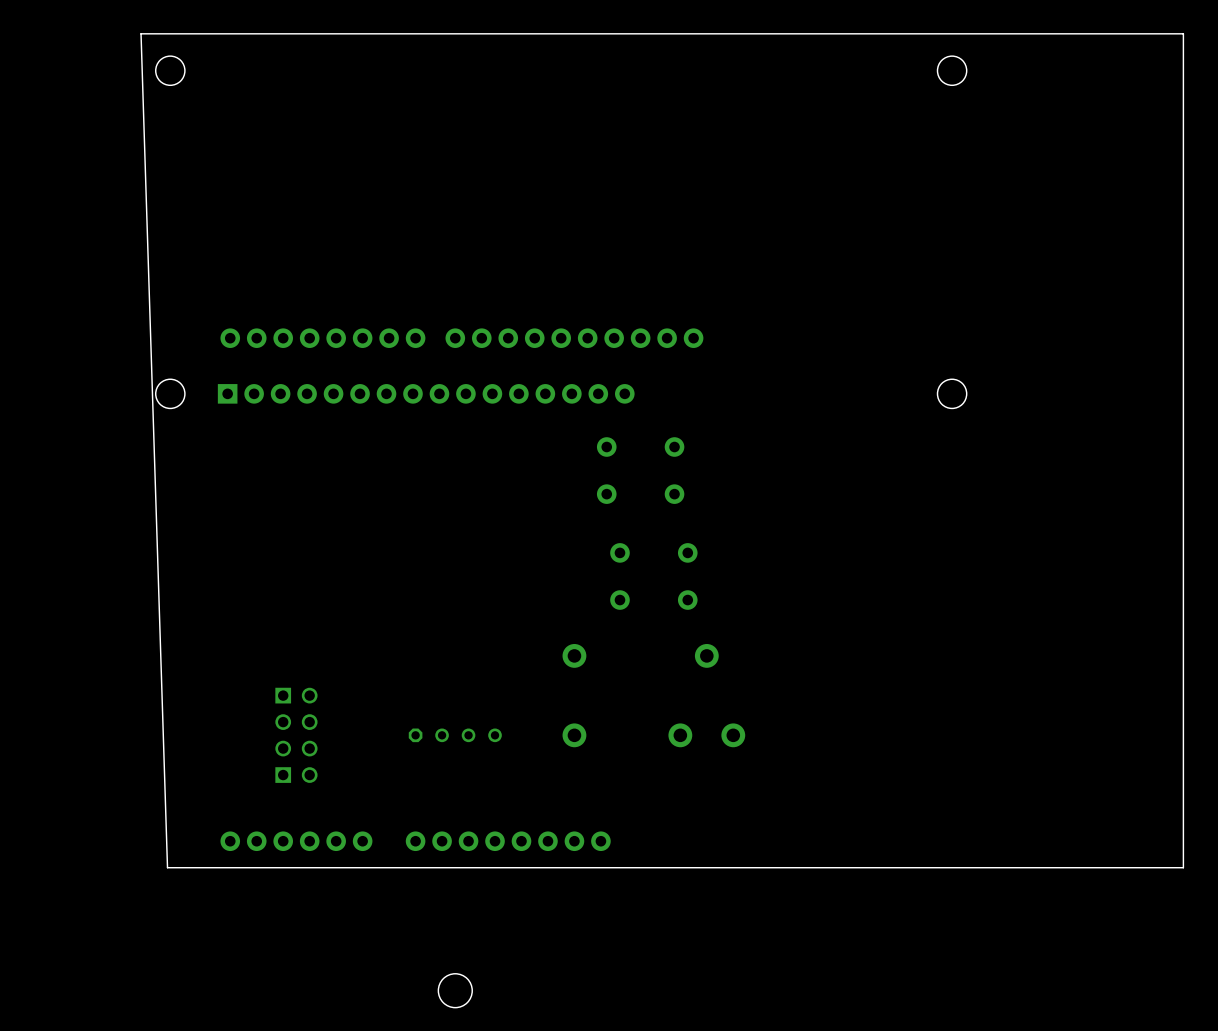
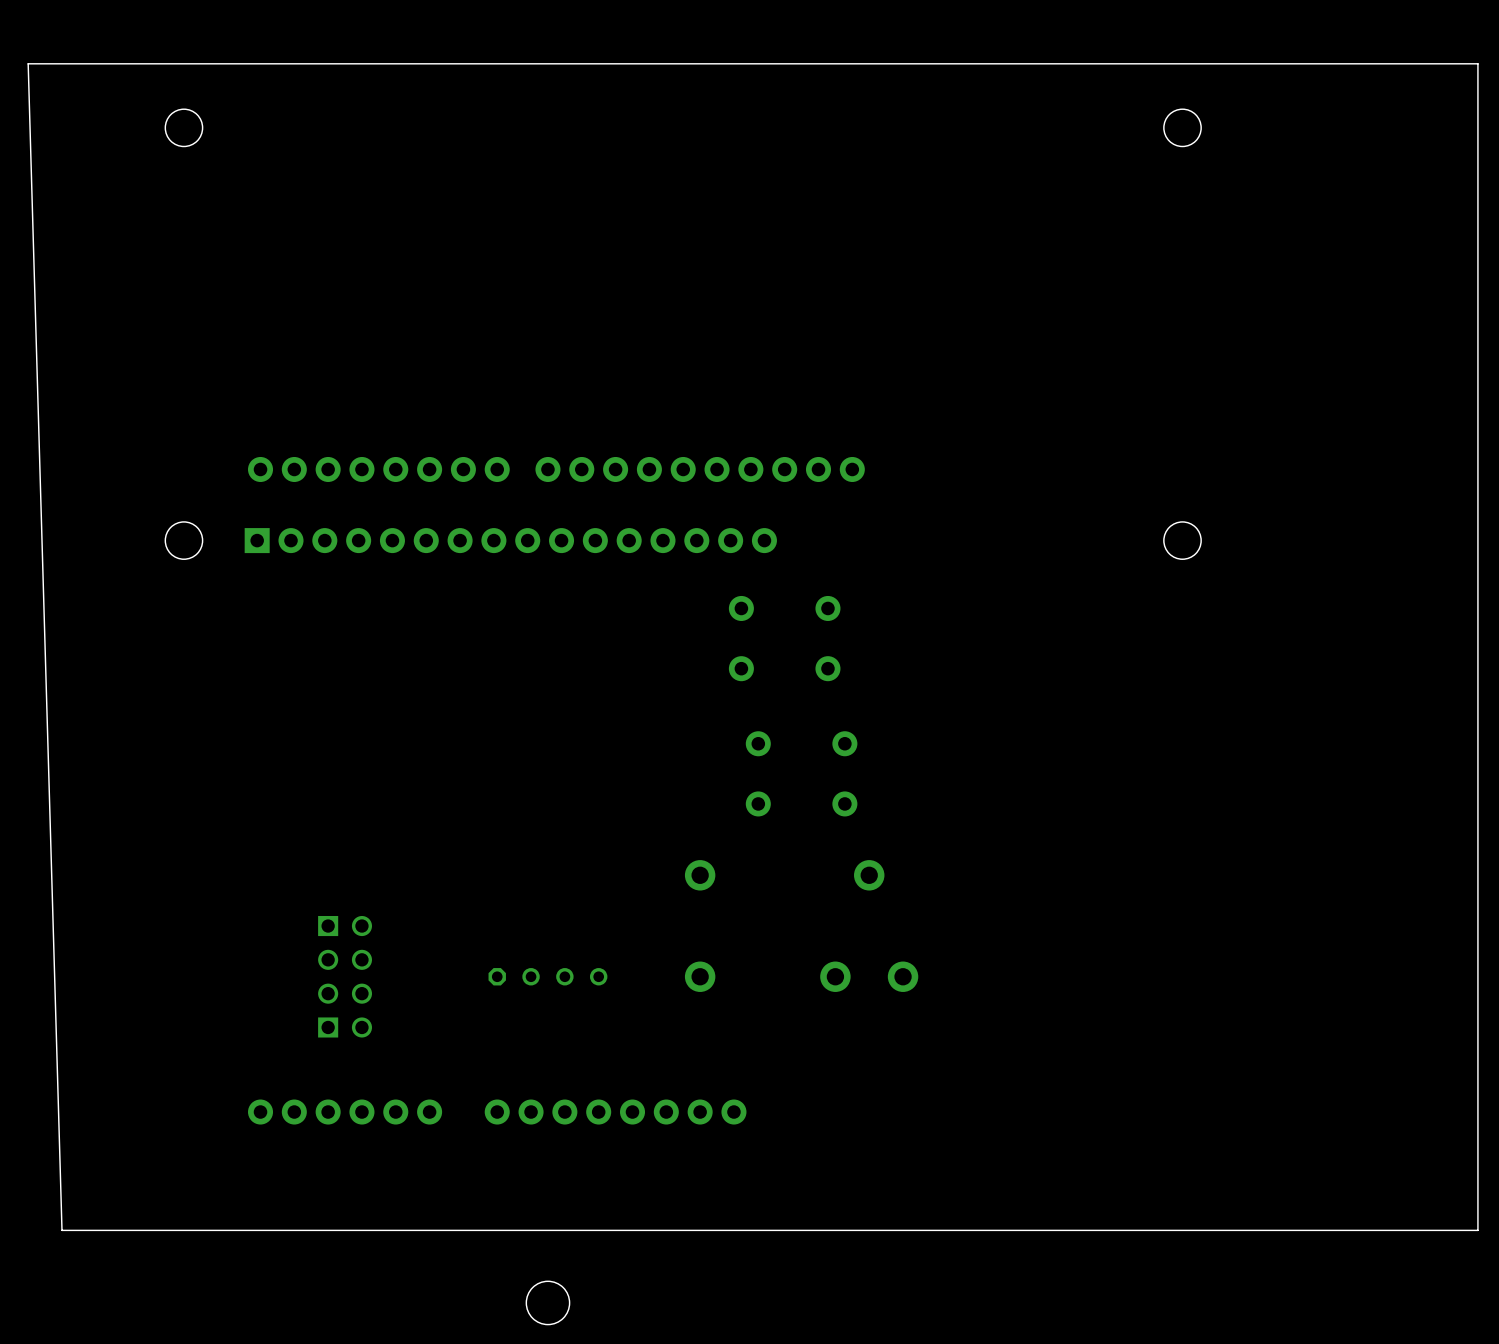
board edge: (1183, 33) (141, 33) (167, 867) (1183, 867) -> (1477, 80) (1477, 63) (28, 63) (62, 1230) (1477, 1230) (1477, 1145)

